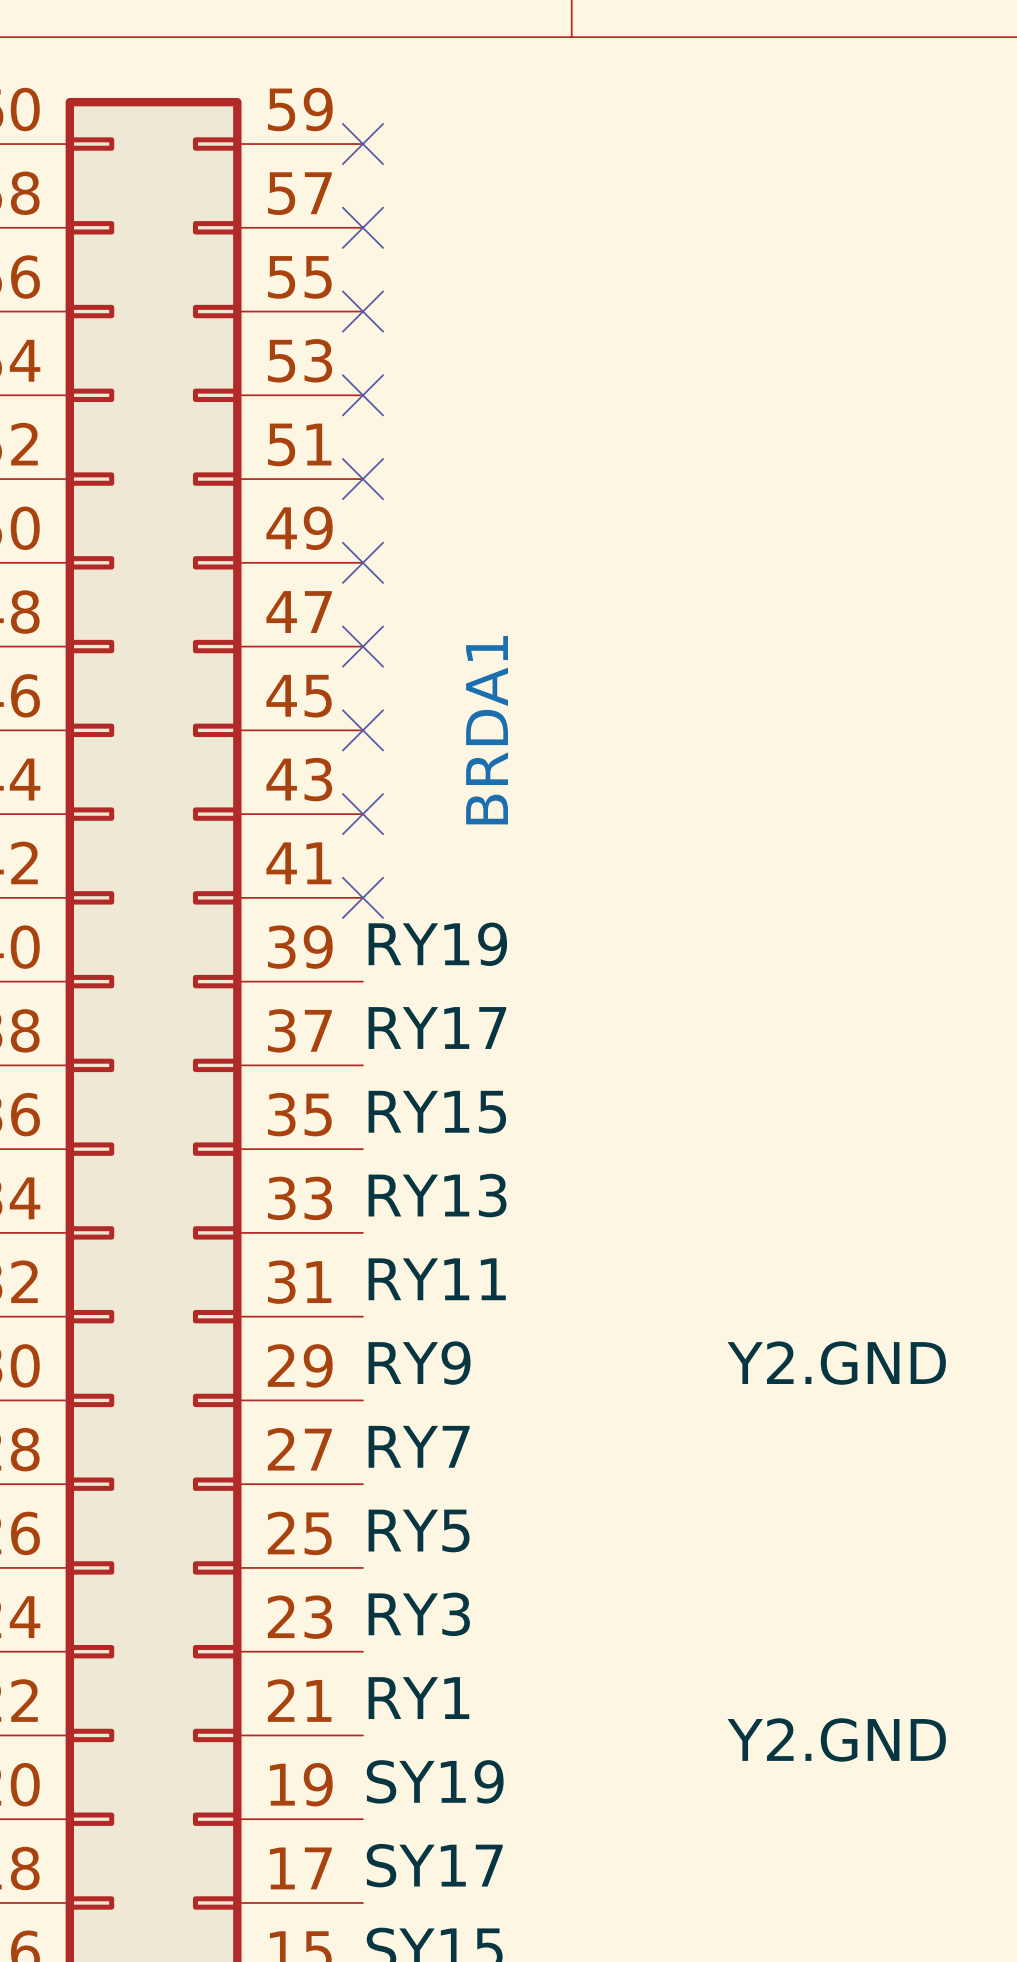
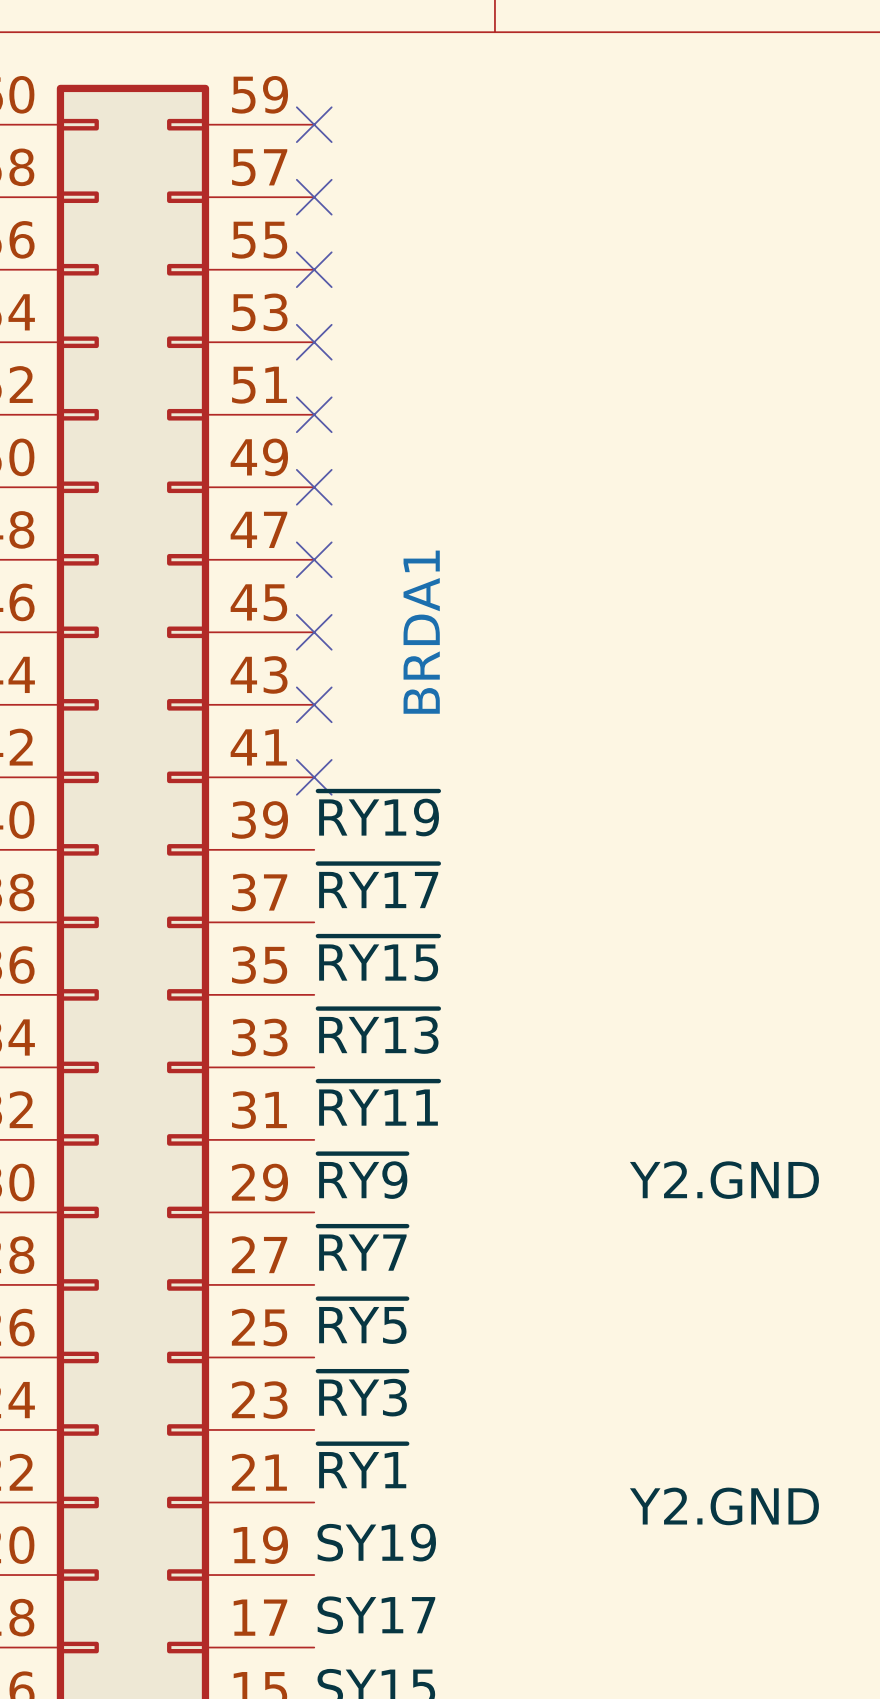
label: RY19 (437, 944) -> ~{RY19} (378, 813)
label: RY17 (437, 1028) -> ~{RY17} (378, 885)
label: RY15 (437, 1112) -> ~{RY15} (378, 958)
label: RY13 (437, 1195) -> ~{RY13} (378, 1031)
label: RY11 (437, 1279) -> ~{RY11} (378, 1103)
label: RY9 (419, 1363) -> ~{RY9} (362, 1176)
label: RY7 (419, 1446) -> ~{RY7} (362, 1248)
label: RY5 (419, 1530) -> ~{RY5} (362, 1321)
label: RY3 (419, 1614) -> ~{RY3} (362, 1393)
label: RY1 (418, 1698) -> ~{RY1} (362, 1465)

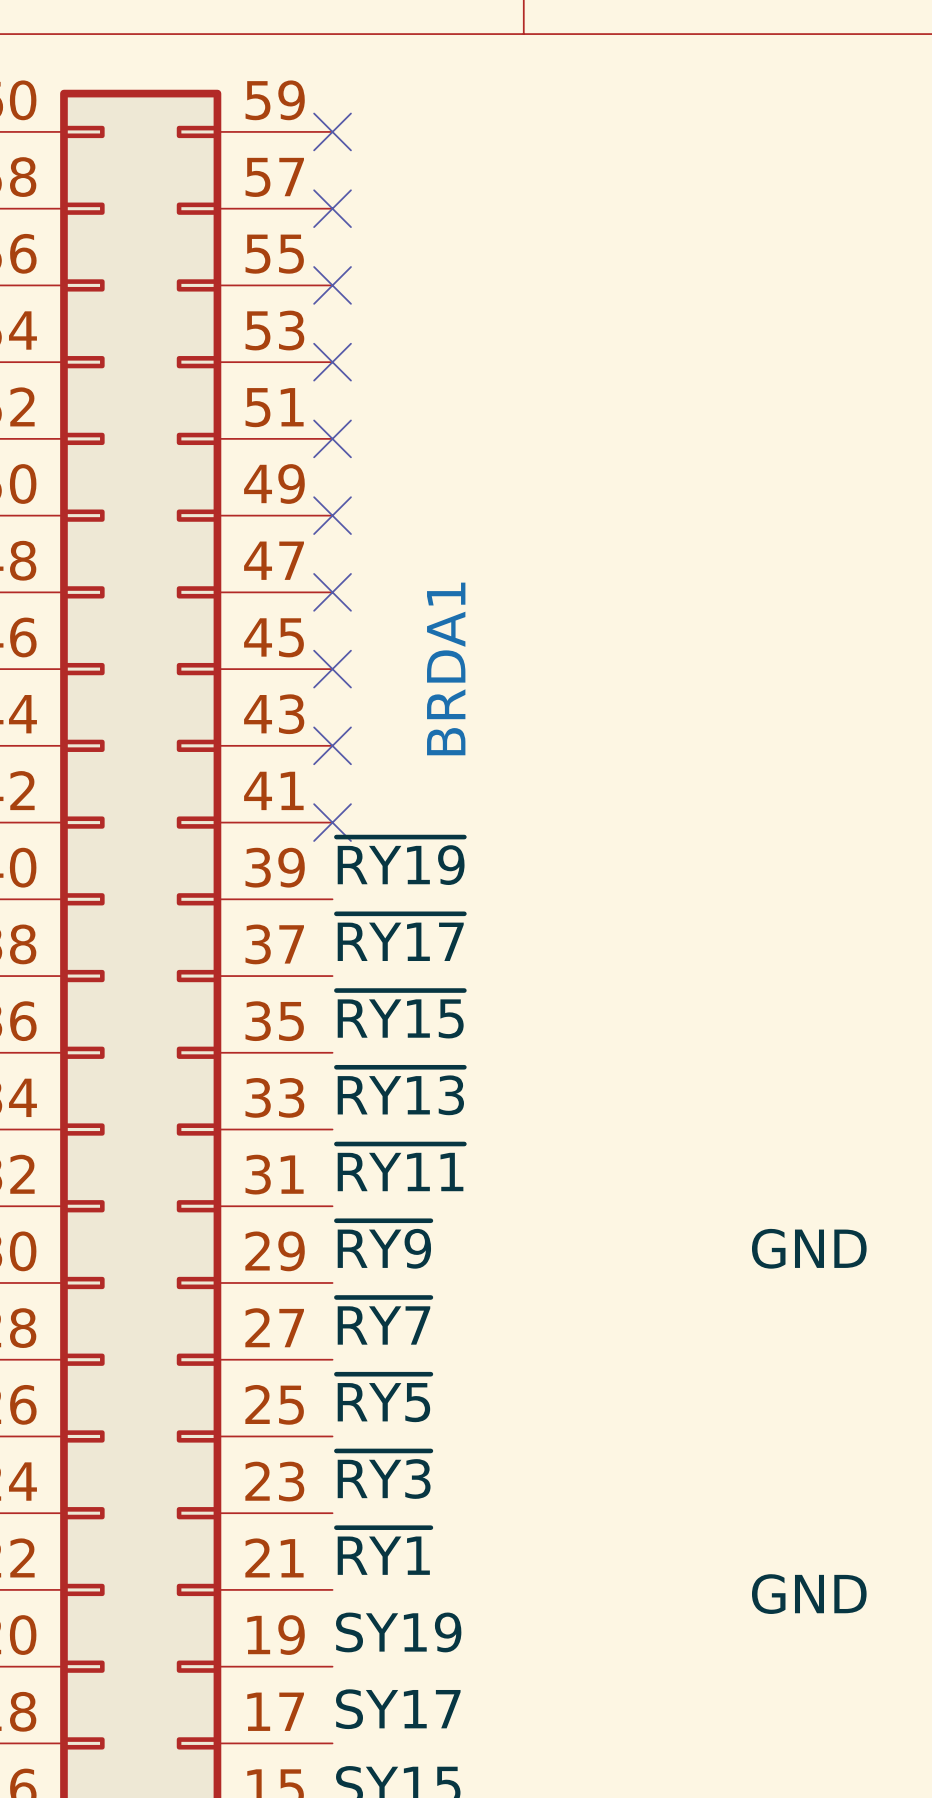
label: Y2.GND (724, 1180) -> GND (809, 1248)
label: Y2.GND (724, 1506) -> GND (809, 1594)

